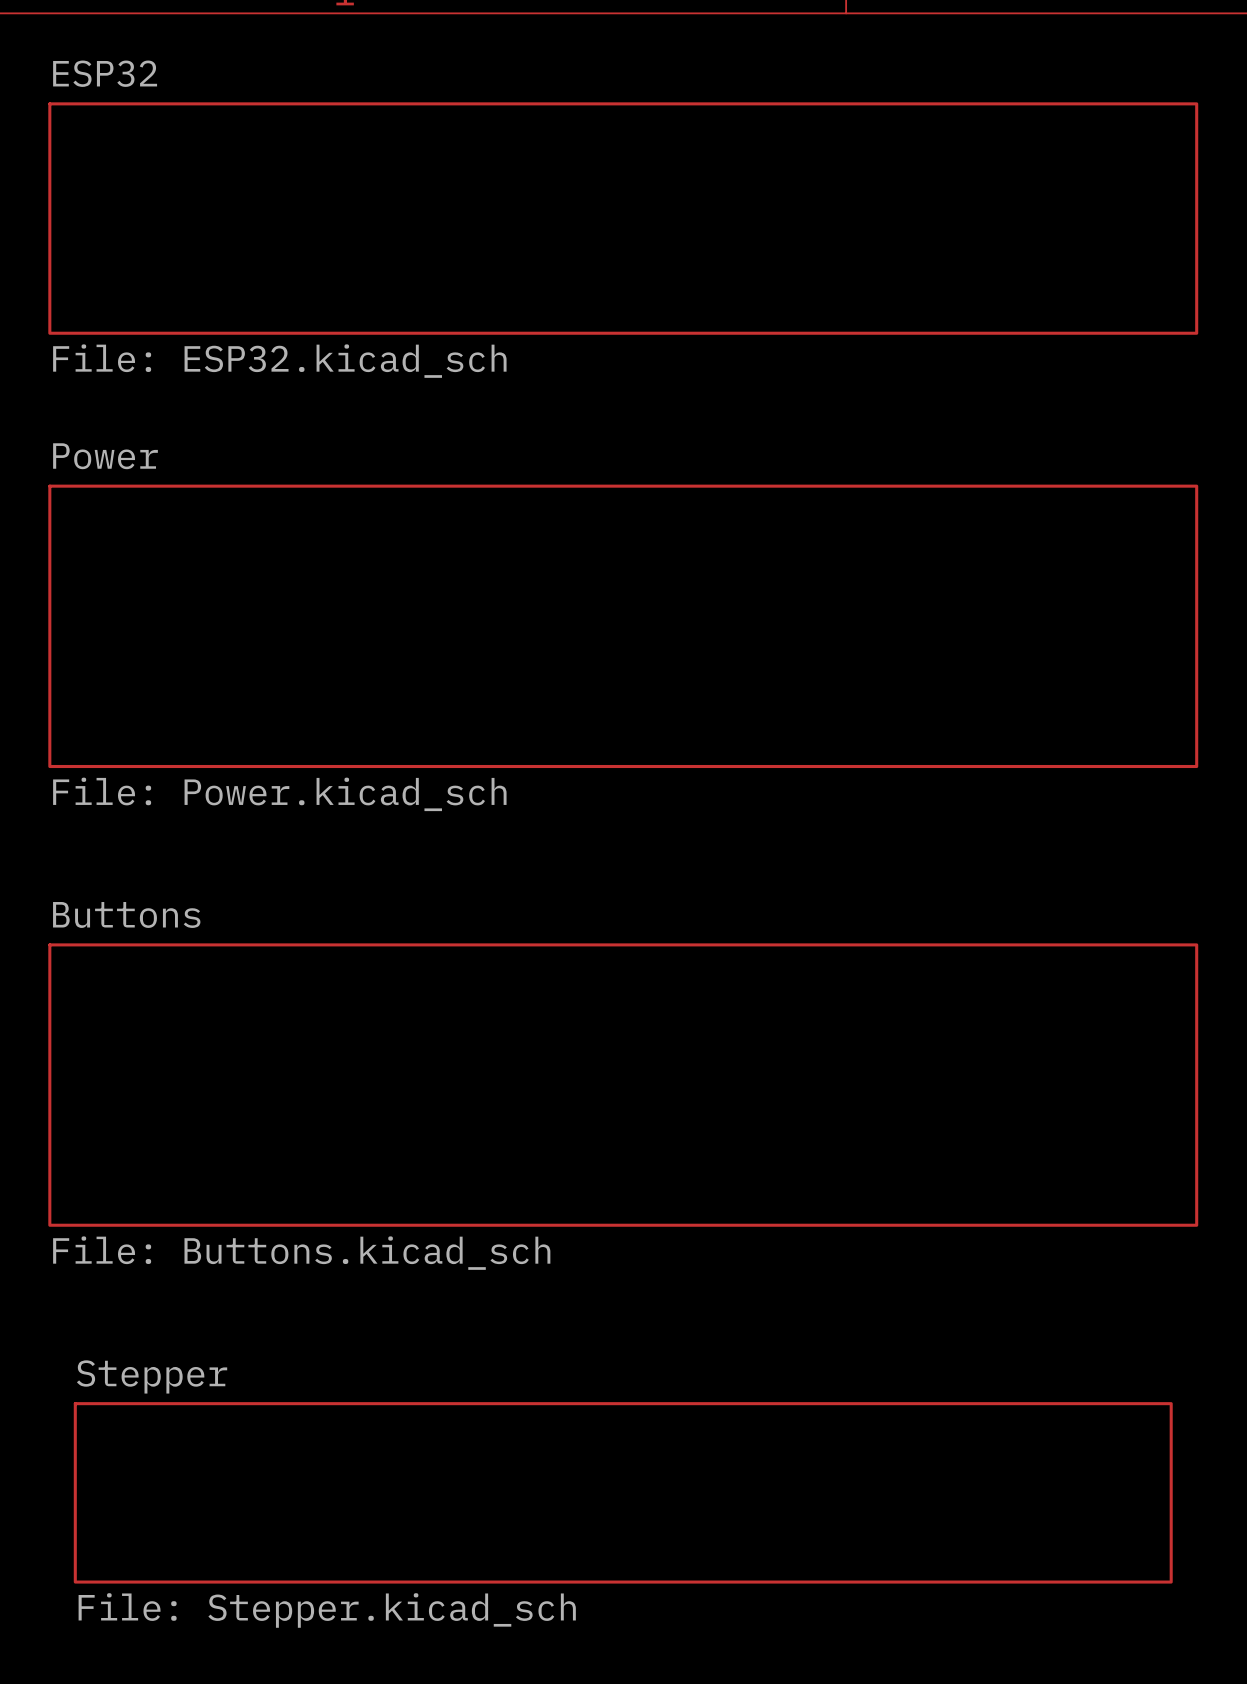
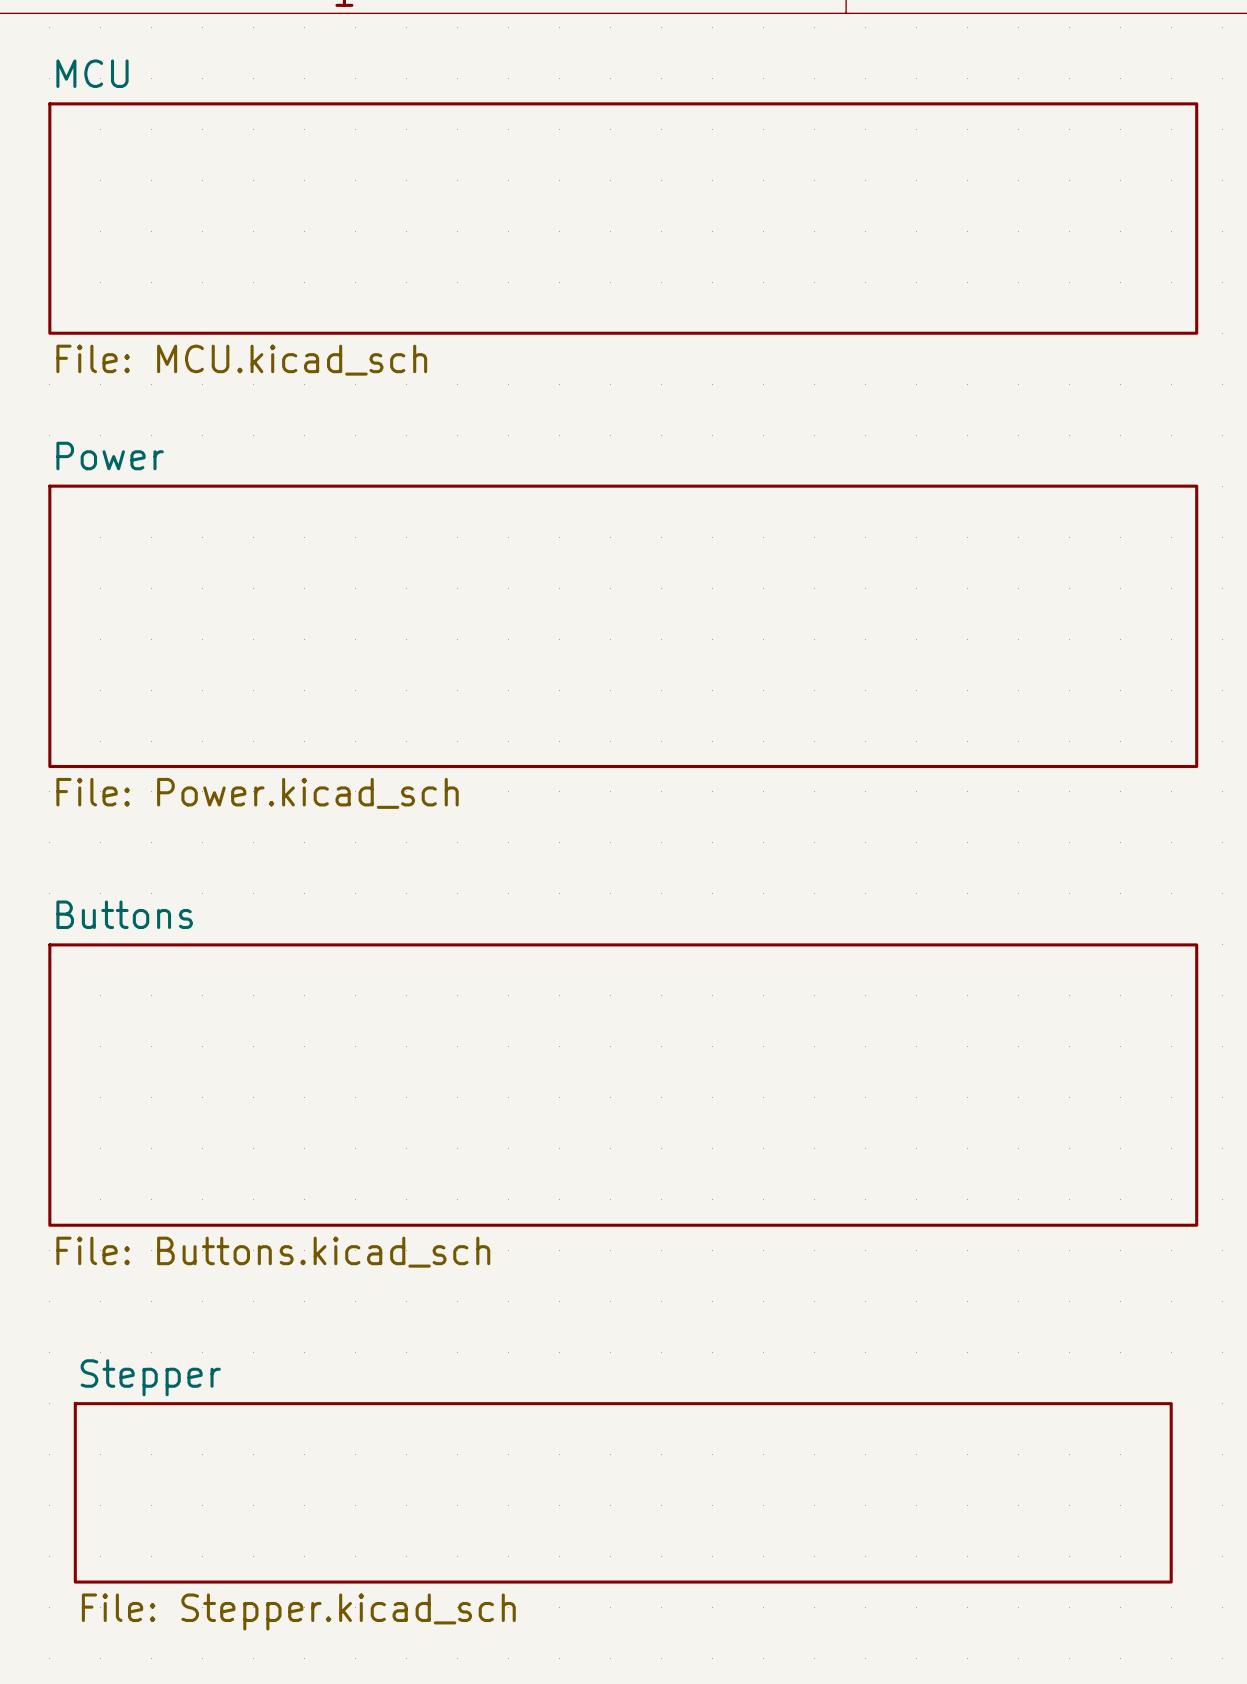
sheet ESP32 name: ESP32 (105, 73) -> MCU (92, 73)
sheet ESP32 value: File: ESP32.kicad_sch (279, 361) -> File: MCU.kicad_sch (241, 360)

